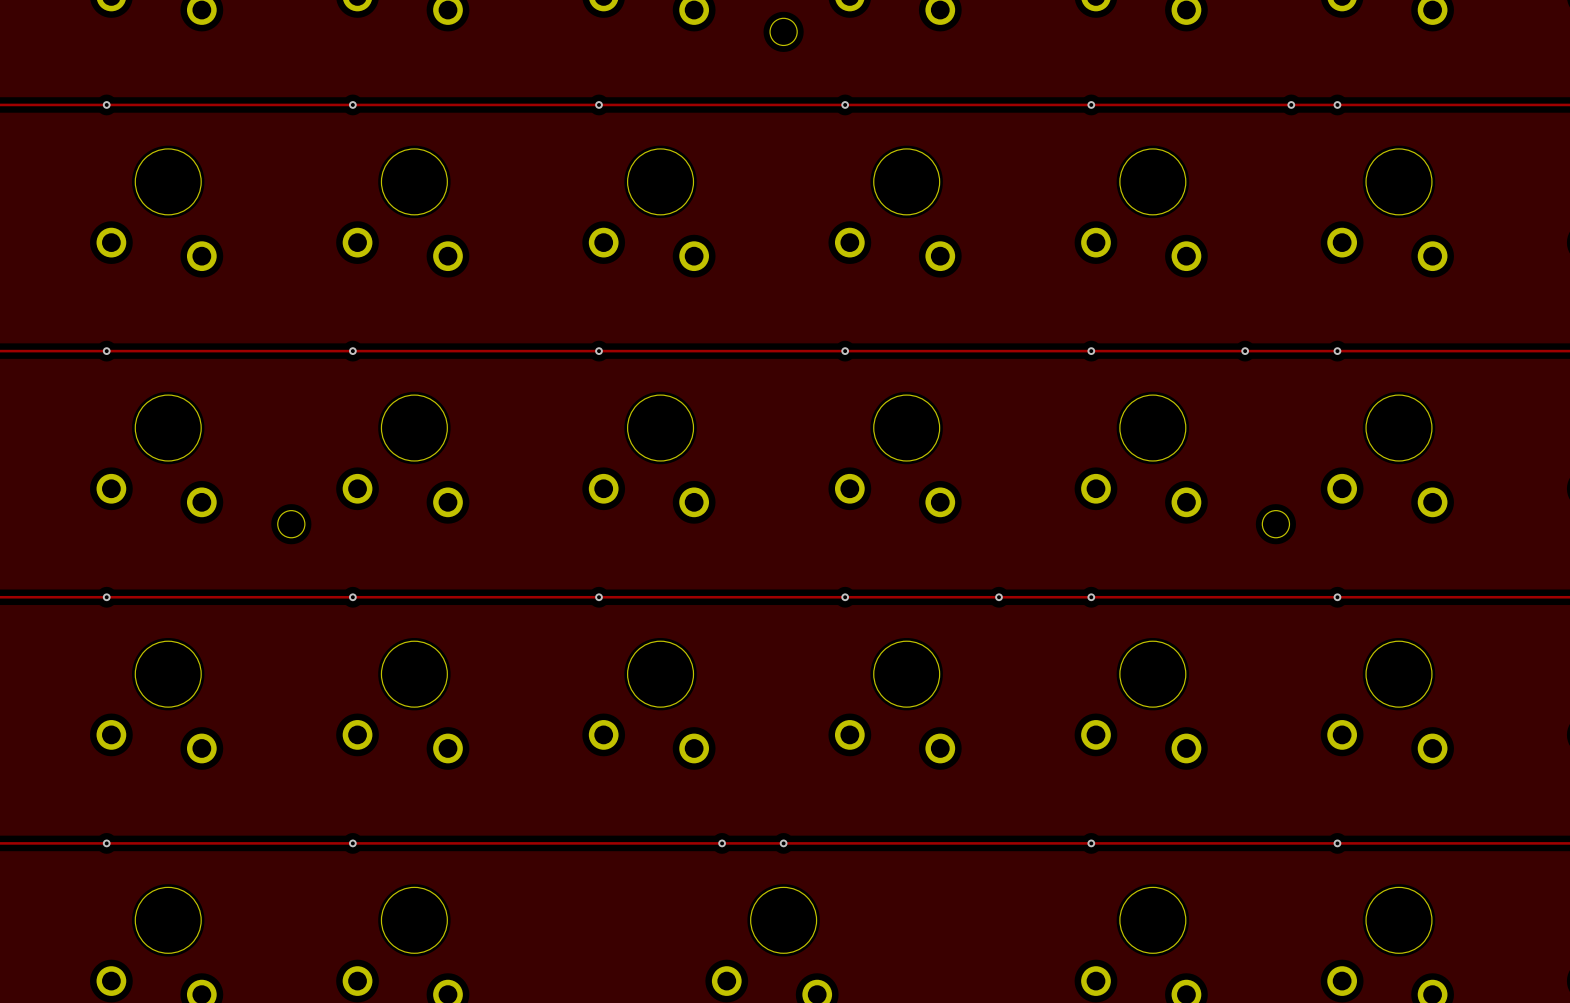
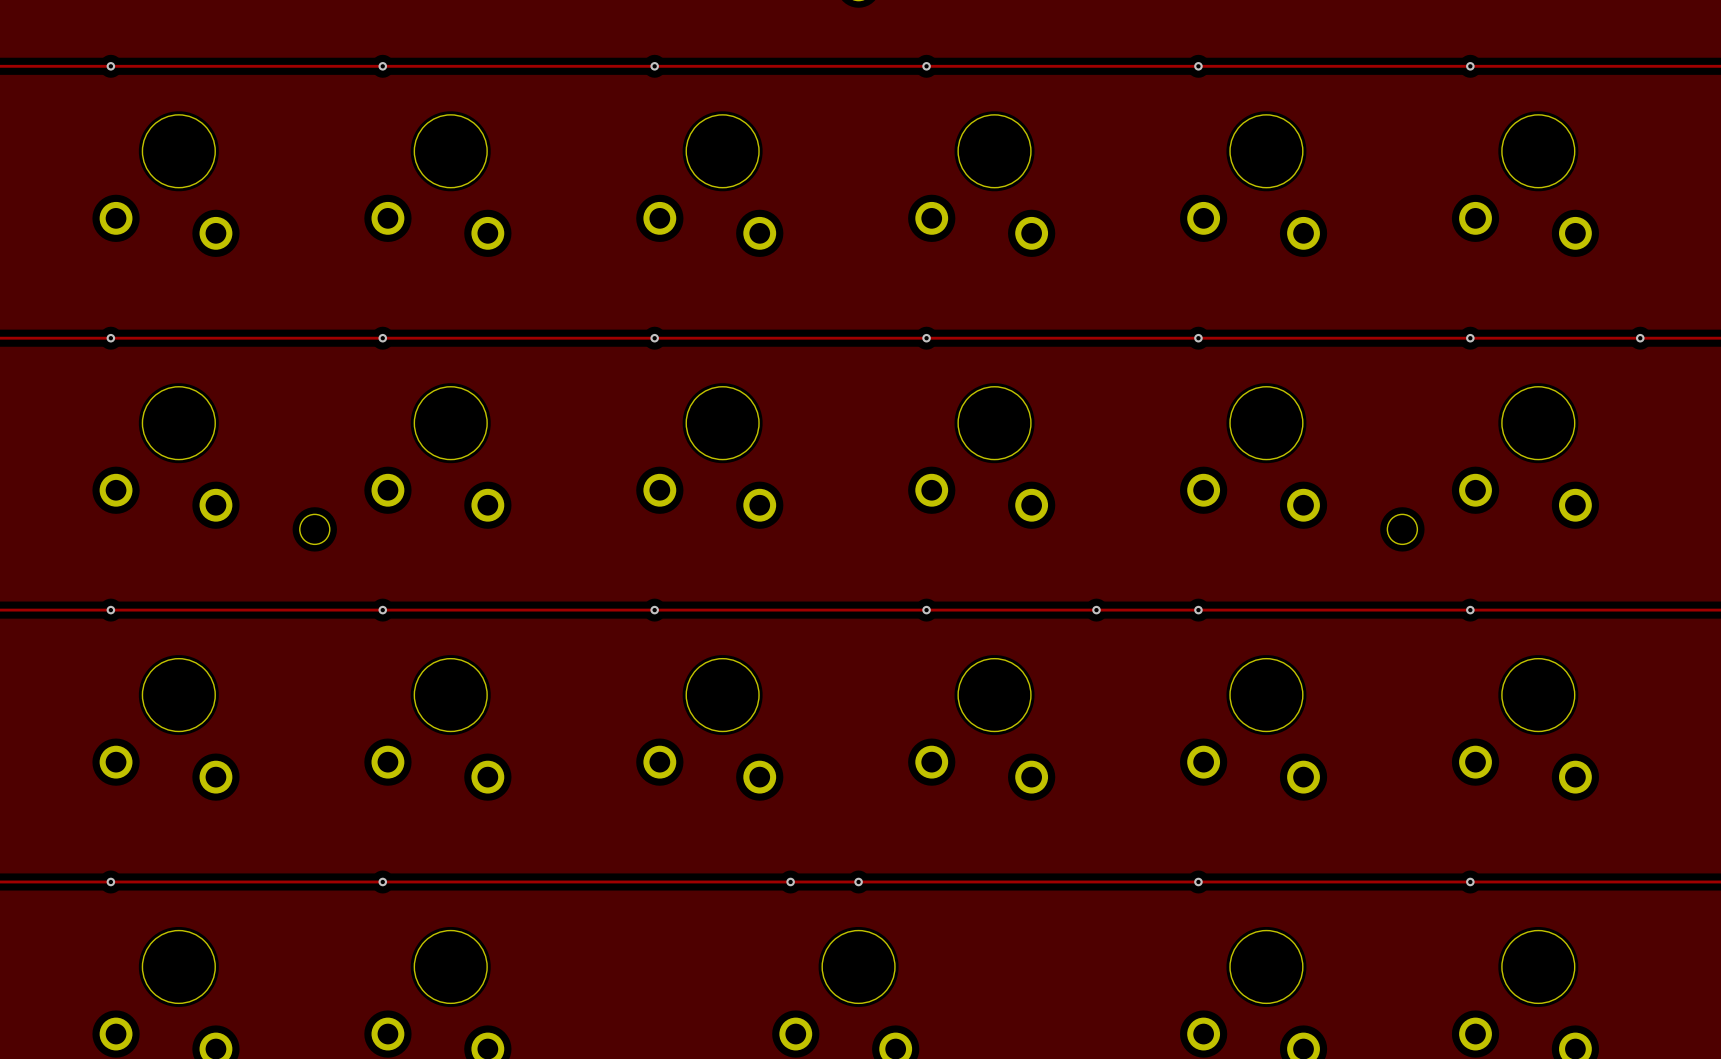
via: (1291, 104) -> none
via: (1245, 351) -> none
via: none -> (1640, 338)

